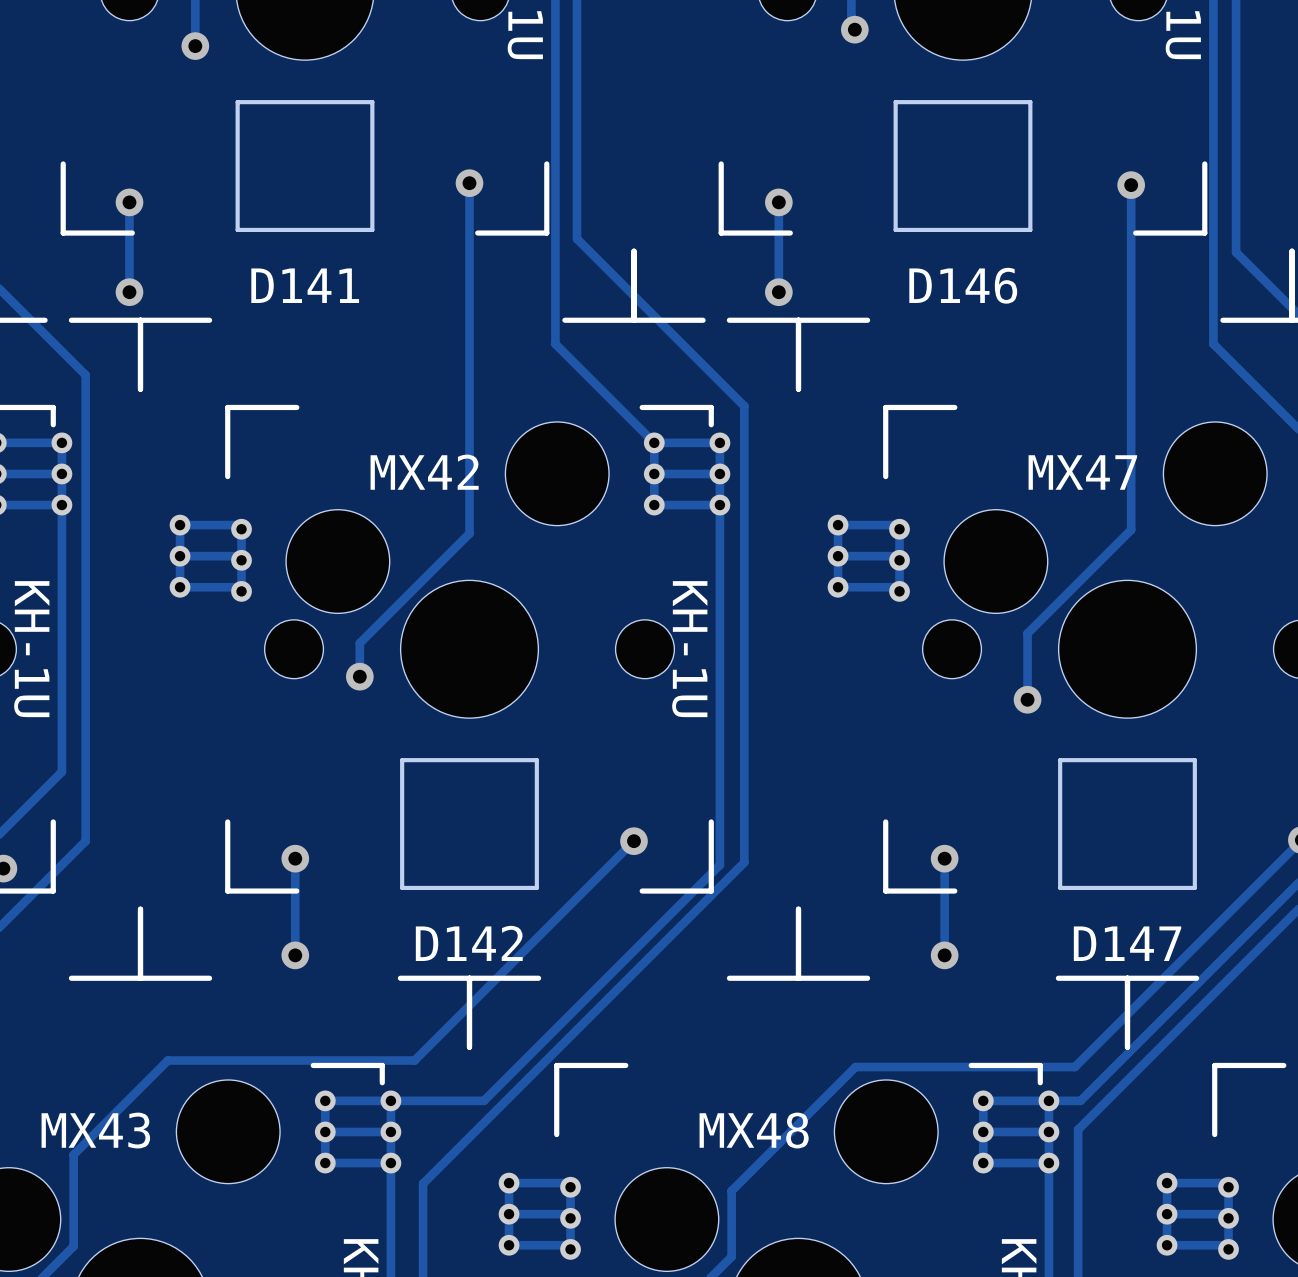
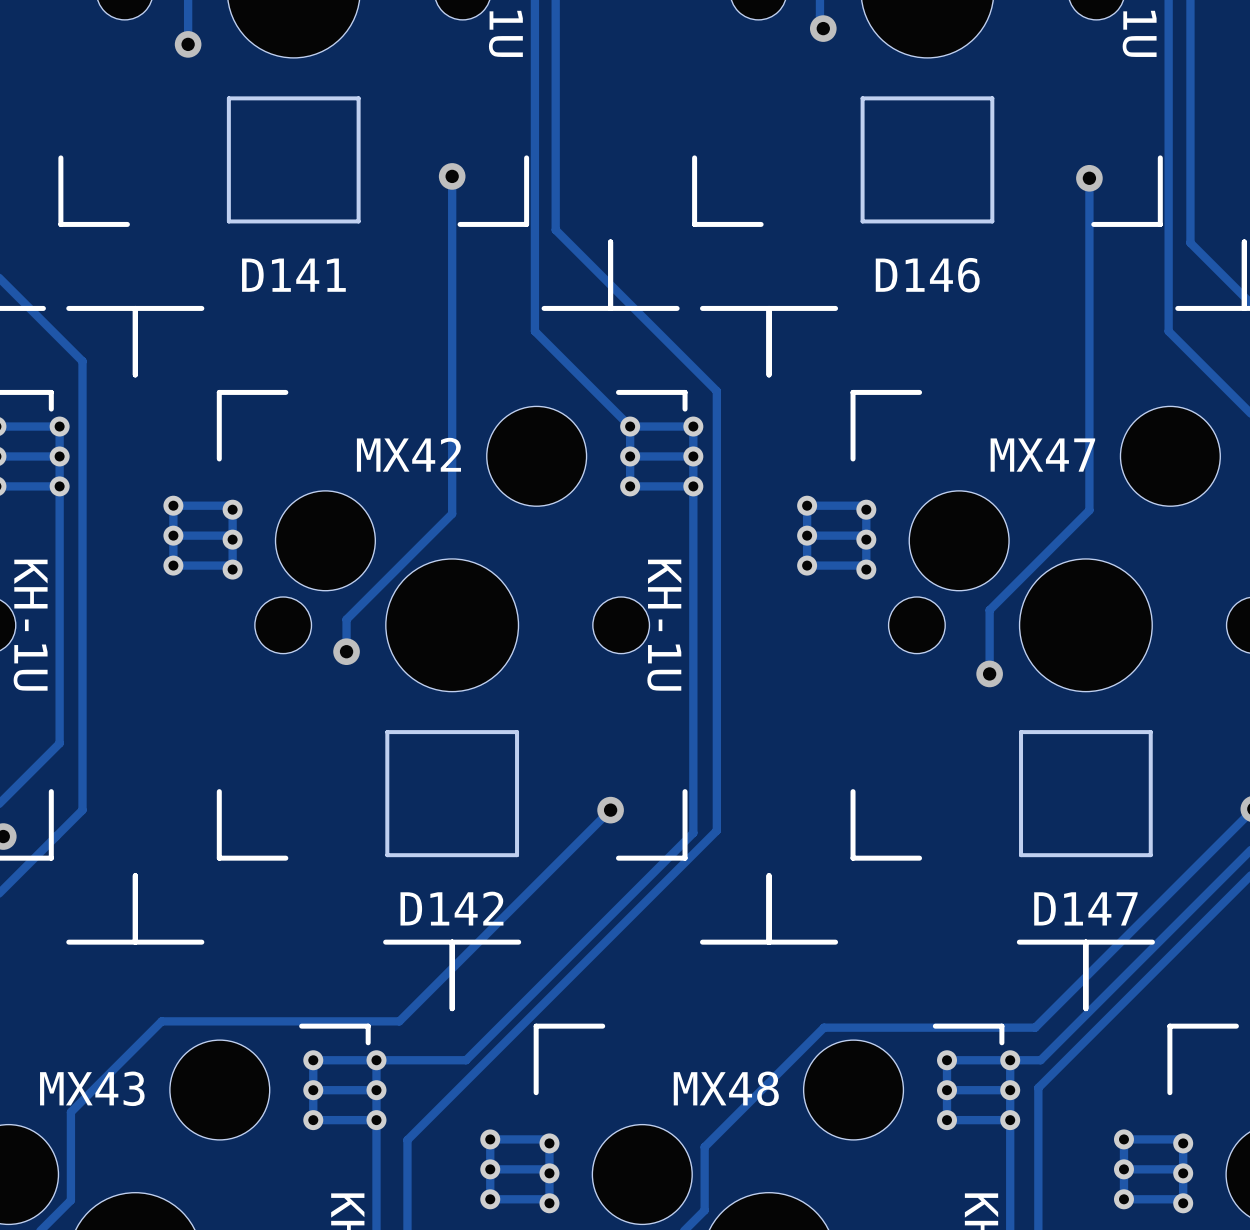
track: (129, 202) (129, 292) -> none
via: (129, 202) -> none
track: (778, 202) (778, 292) -> none
via: (778, 202) -> none
via: (129, 292) -> none
via: (778, 292) -> none
track: (295, 858) (295, 955) -> none
via: (295, 858) -> none
track: (944, 858) (944, 955) -> none
via: (944, 858) -> none
via: (295, 955) -> none
via: (944, 955) -> none

